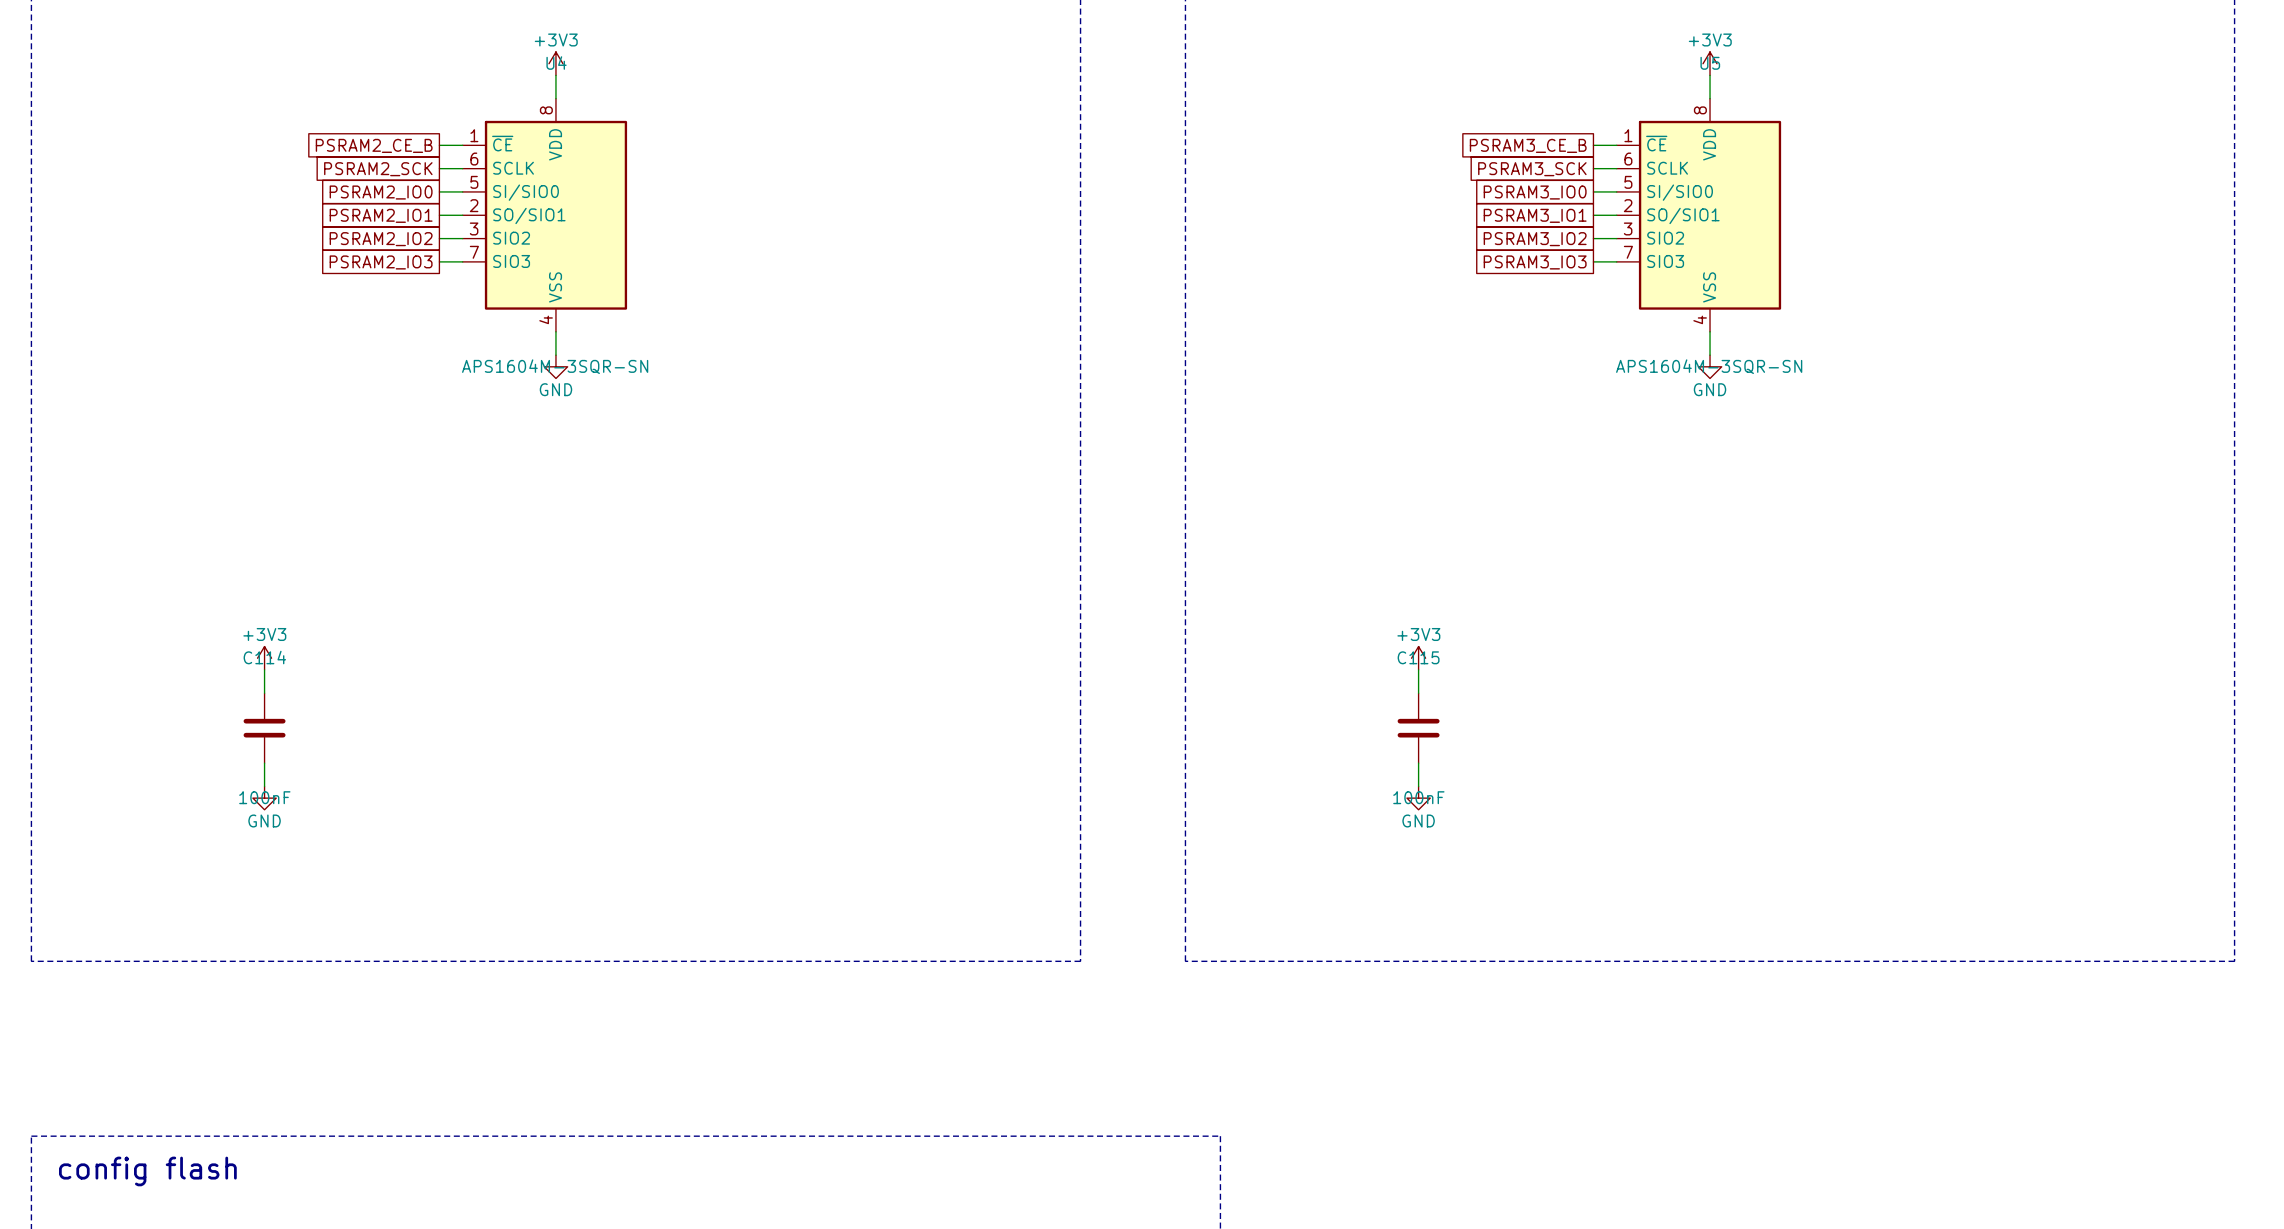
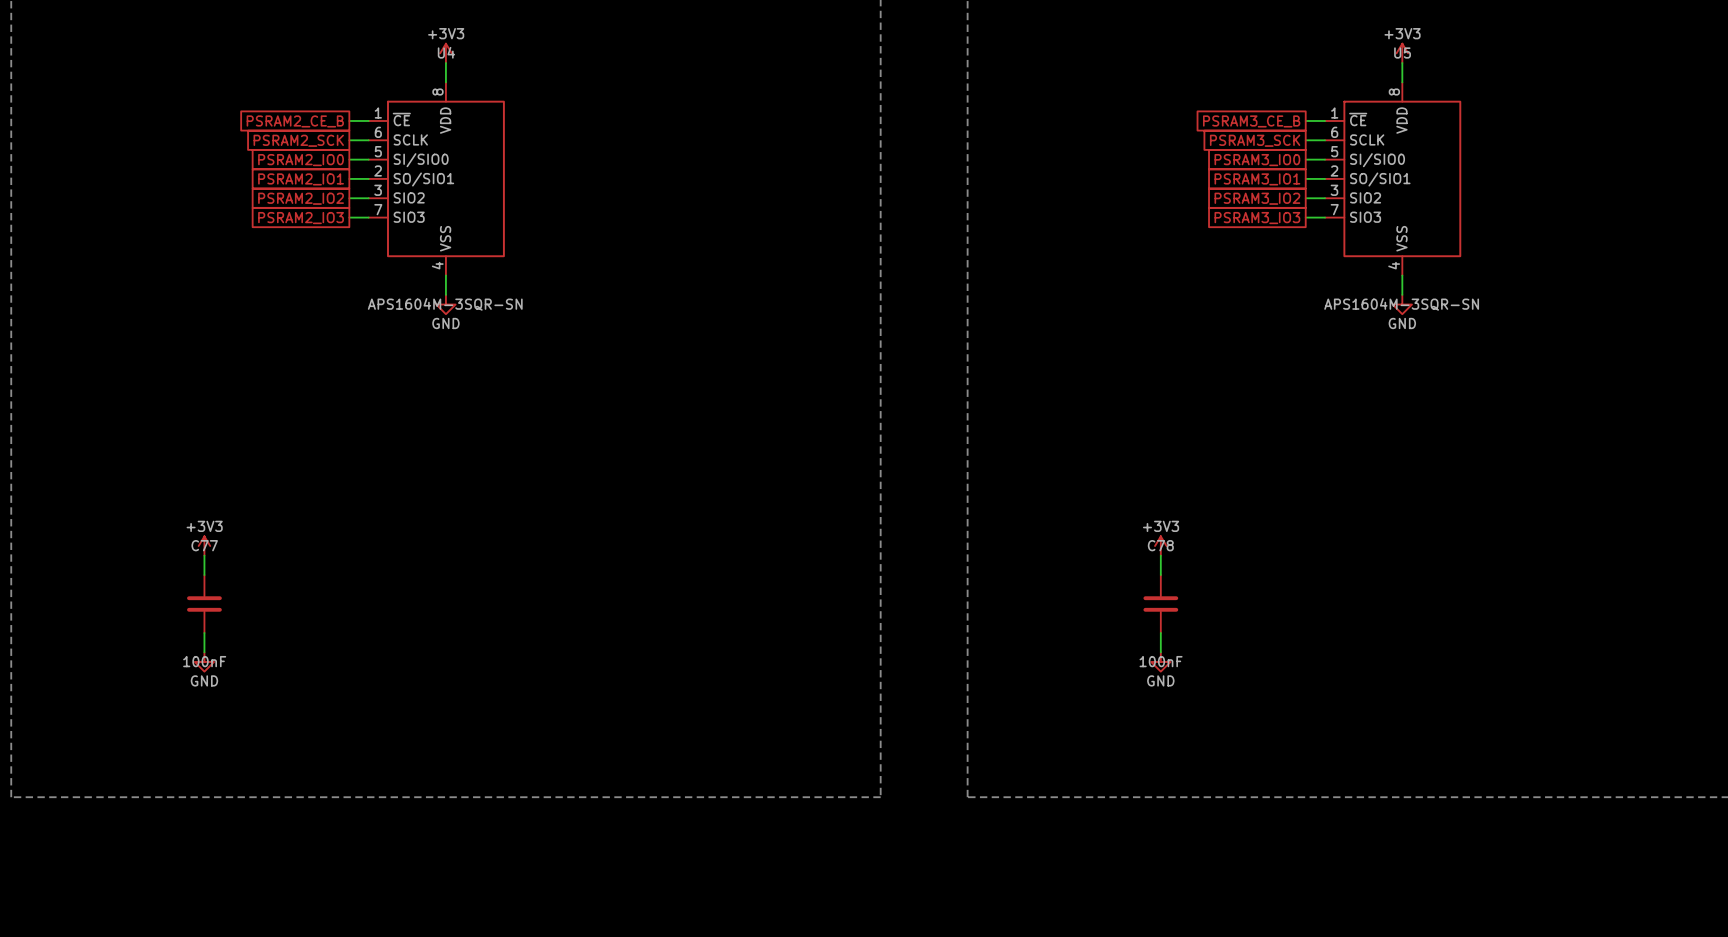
C114 name: C114 (264, 657) -> C77 (204, 545)
C115 name: C115 (1418, 657) -> C78 (1160, 545)

